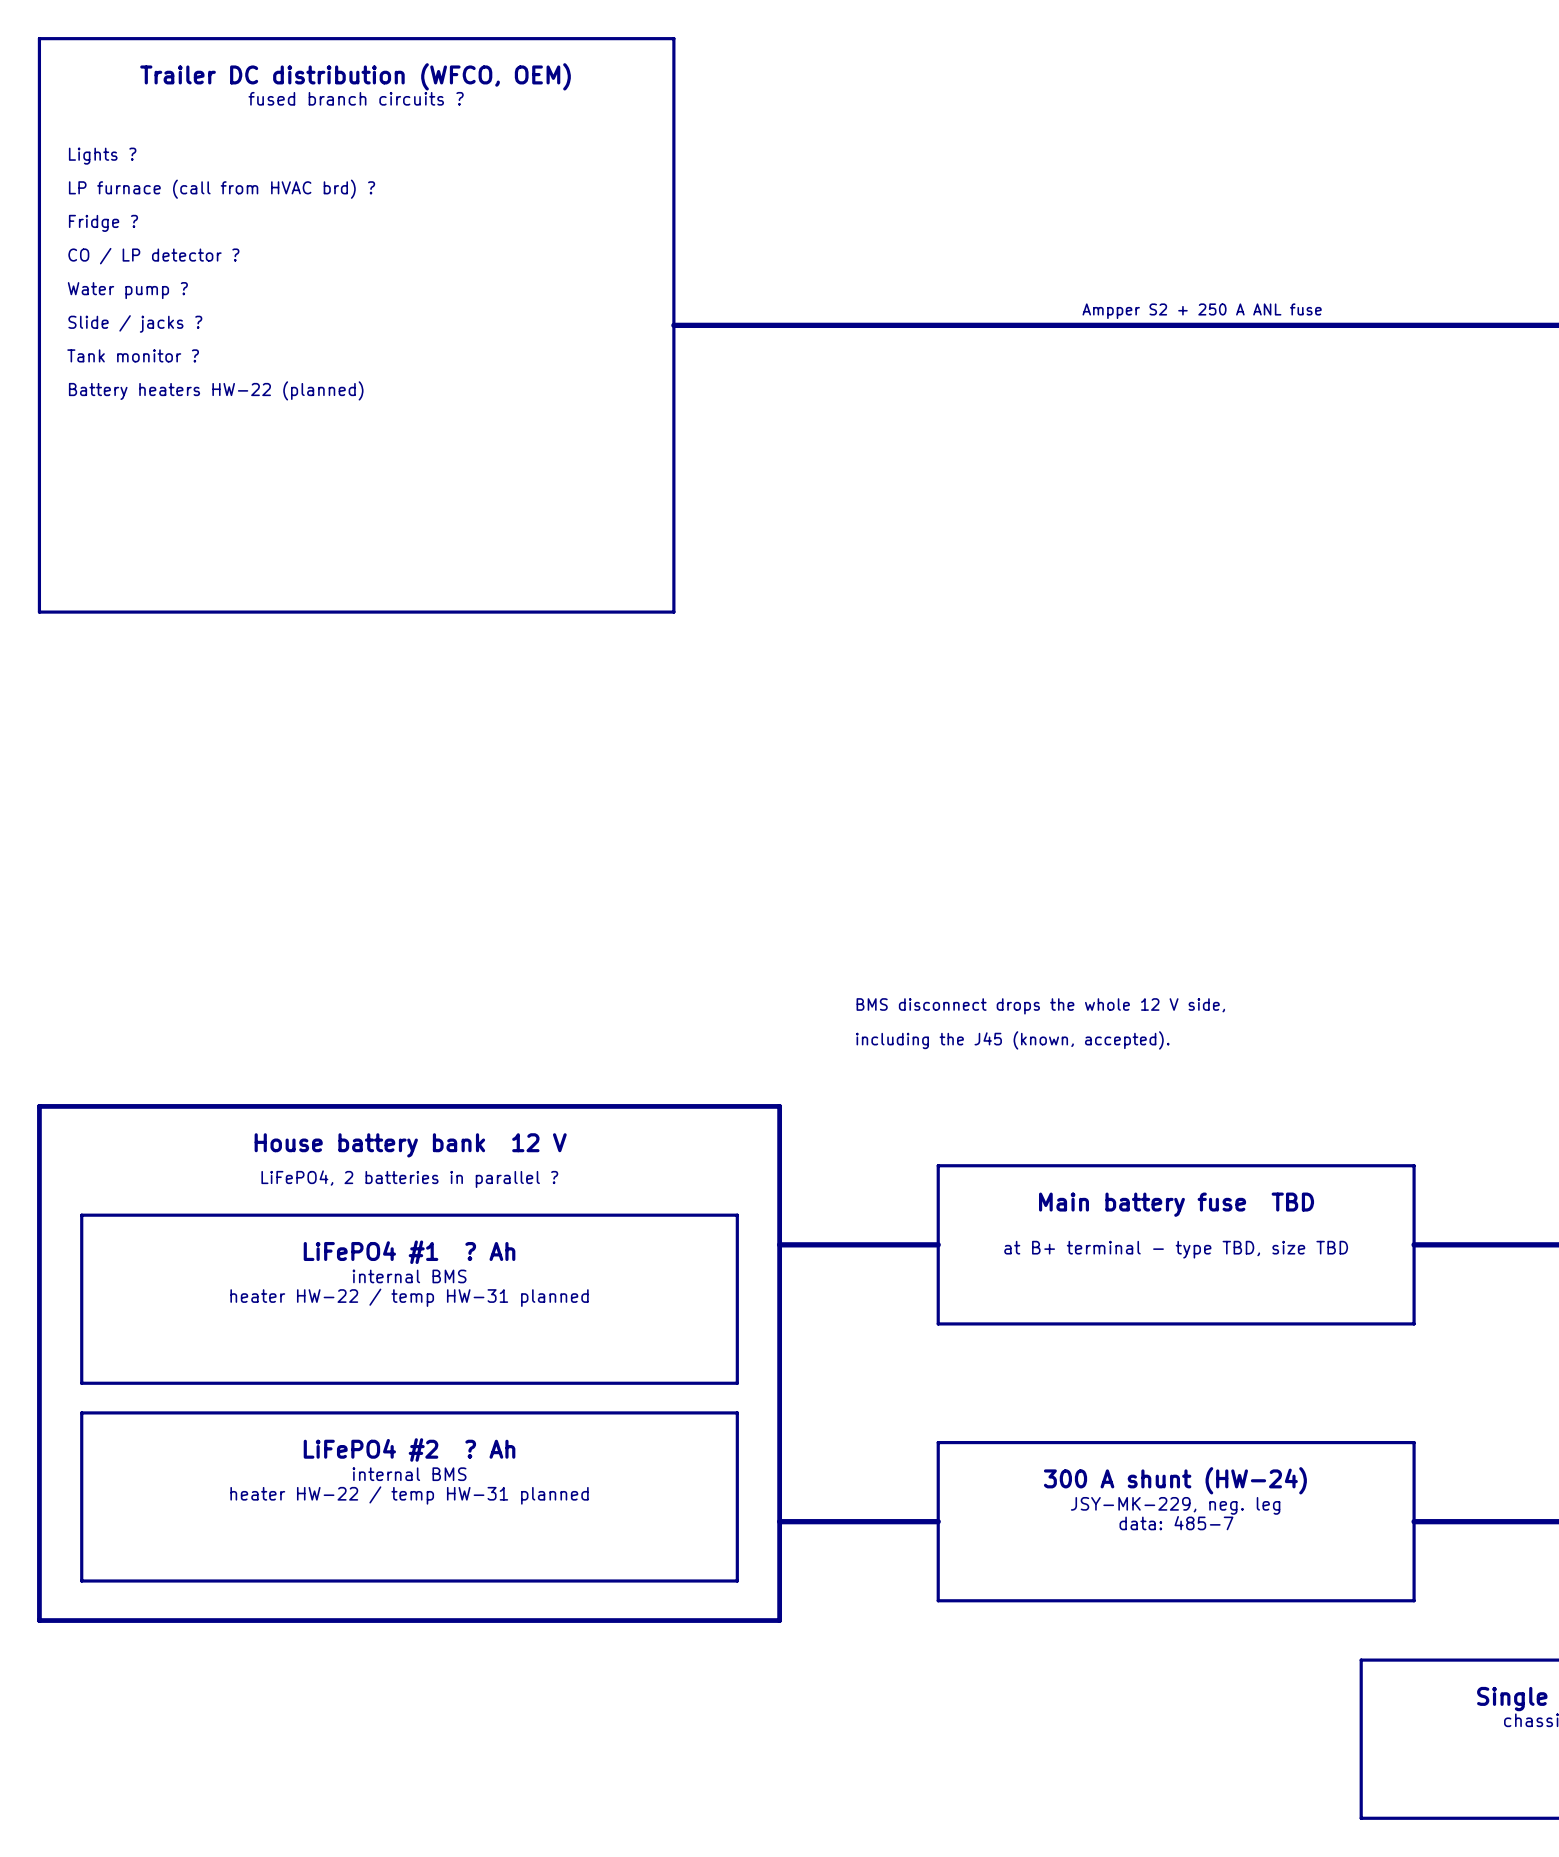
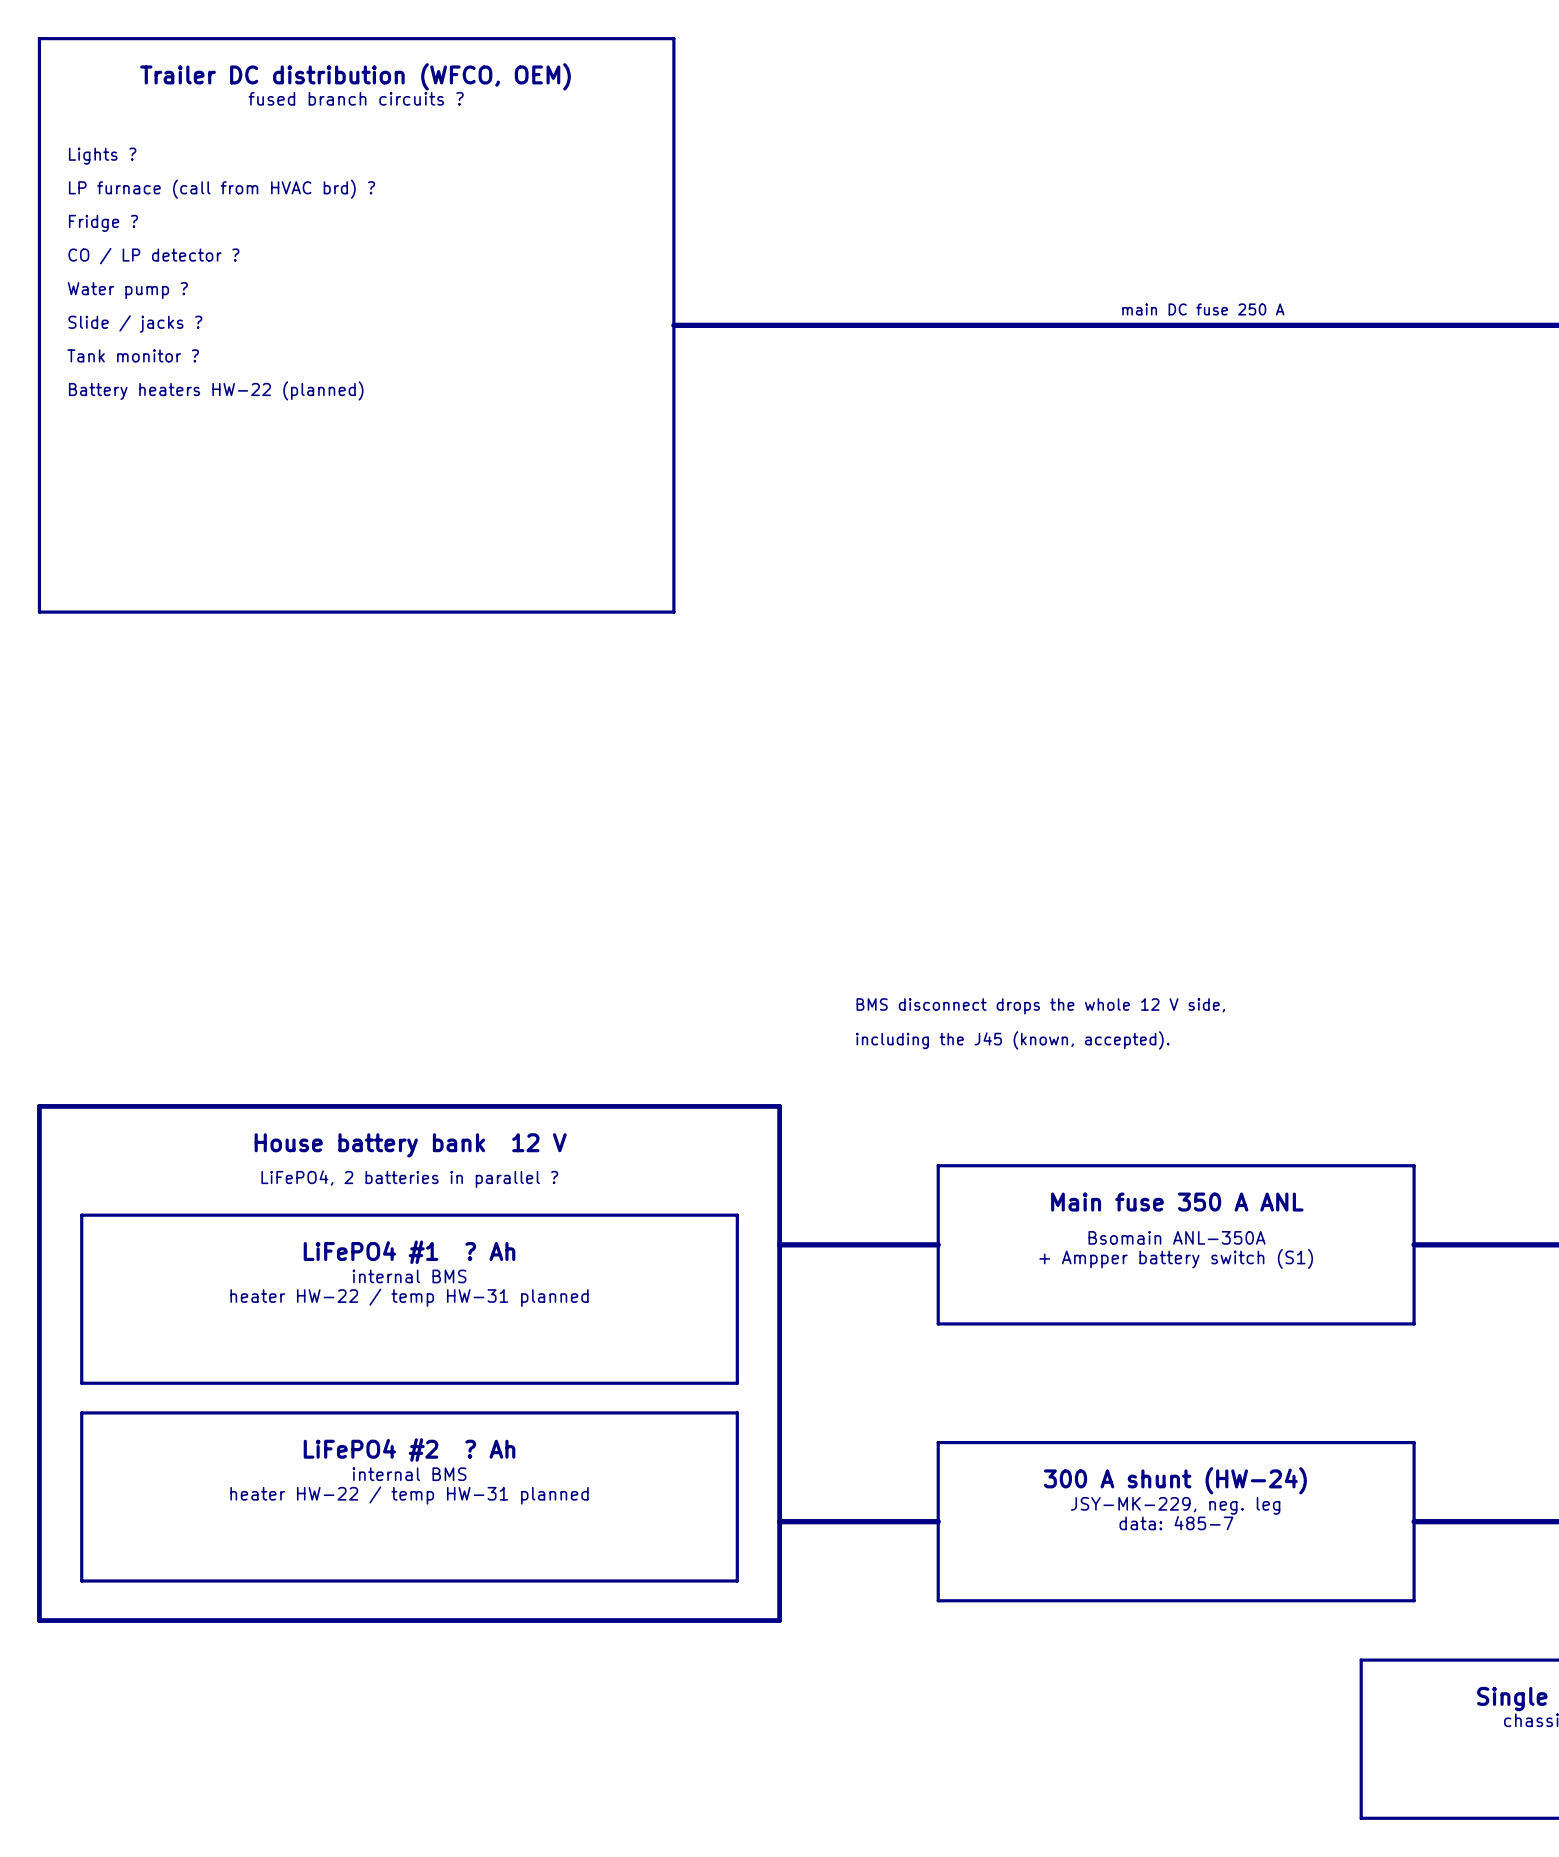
text: Ampper S2 + 250 A ANL fuse (1202, 311) -> main DC fuse 250 A (1203, 309)
text: Main battery fuse TBD (1176, 1204) -> Main fuse 350 A ANL (1177, 1202)
text: none -> Bsomain ANL-350A (1177, 1237)
text: at B+ terminal - type TBD, size TBD (1176, 1249) -> none
text: none -> + Ampper battery switch (S1) (1176, 1258)

